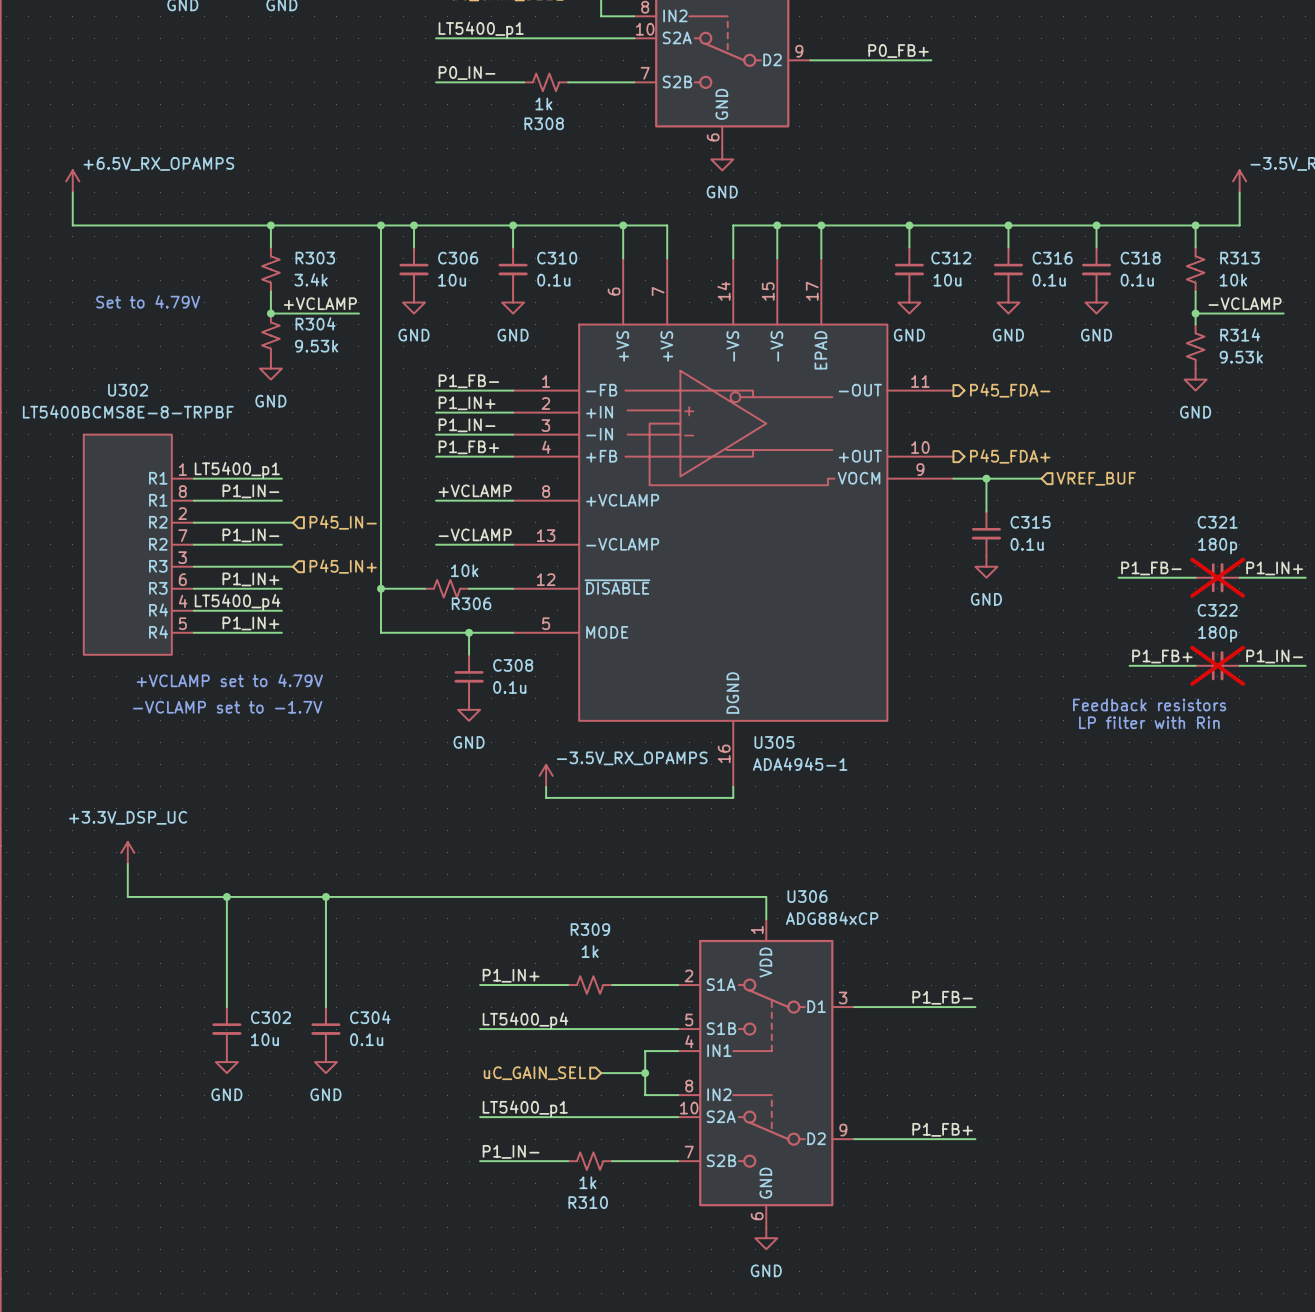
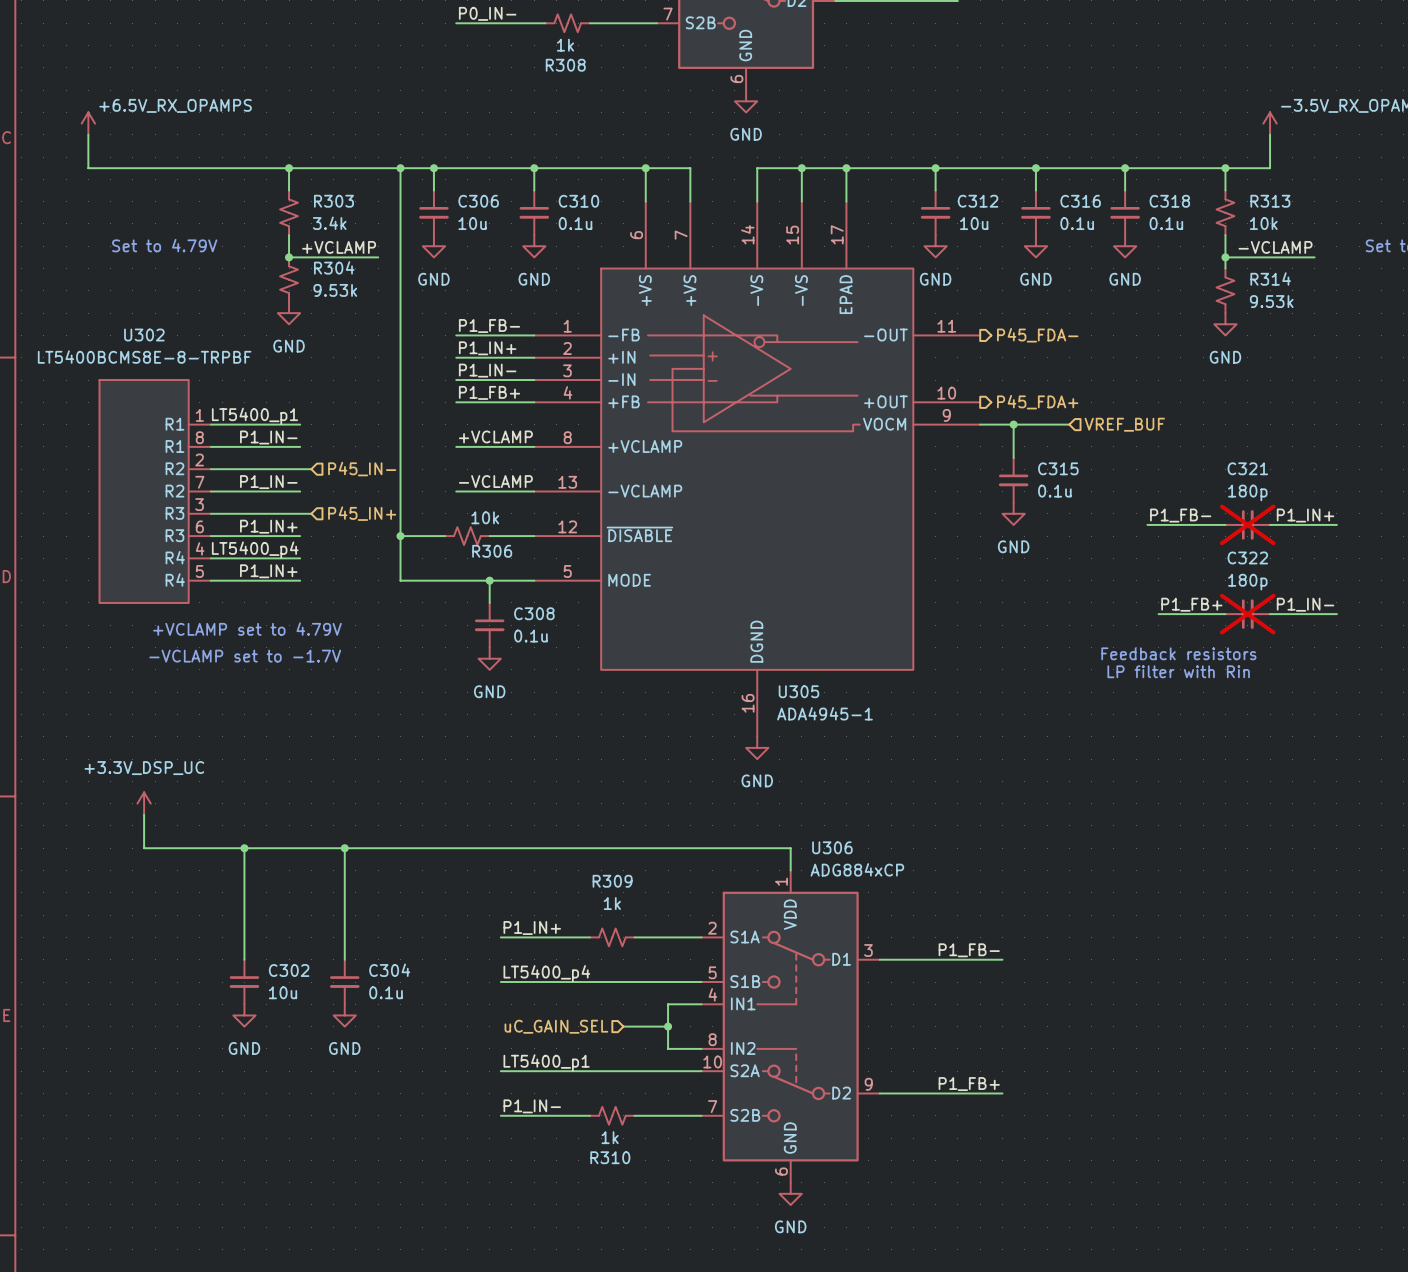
power symbol: -3.5V_RX_OPAMPS (546, 775) -> none
wire: (546, 786) (546, 797) (733, 797) (733, 786) -> none
power symbol: none -> GND (757, 747)

